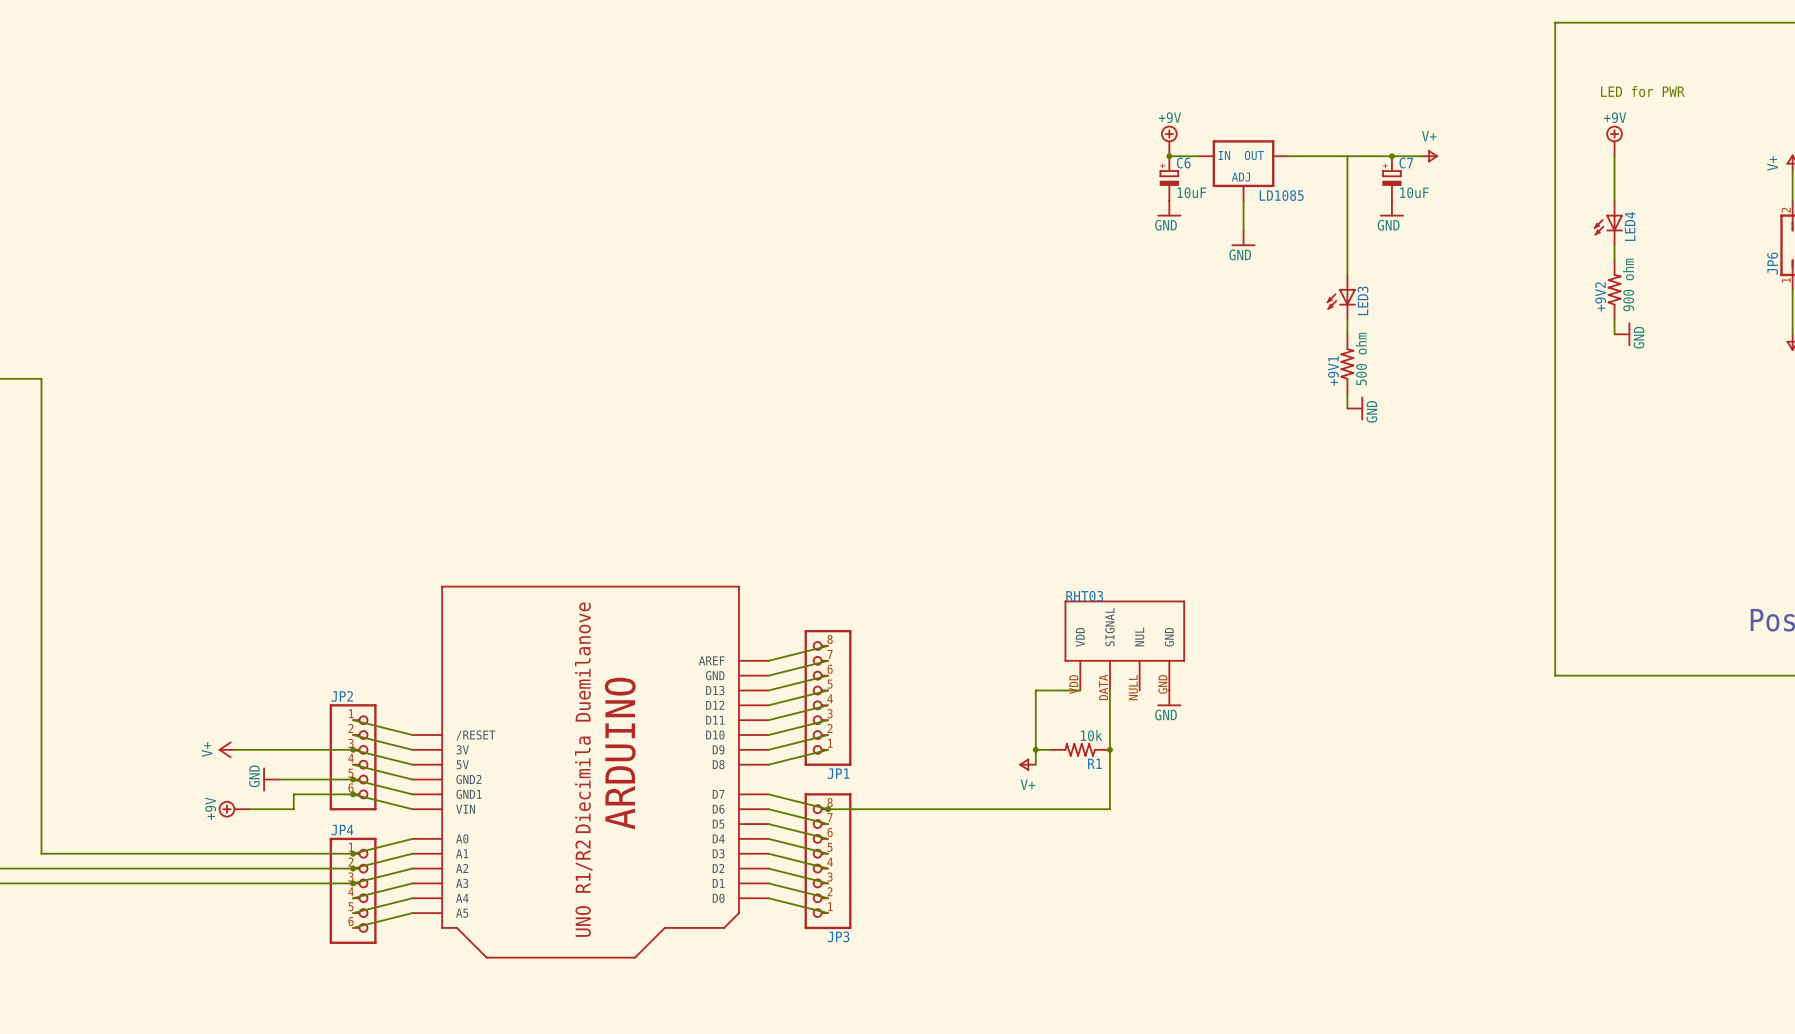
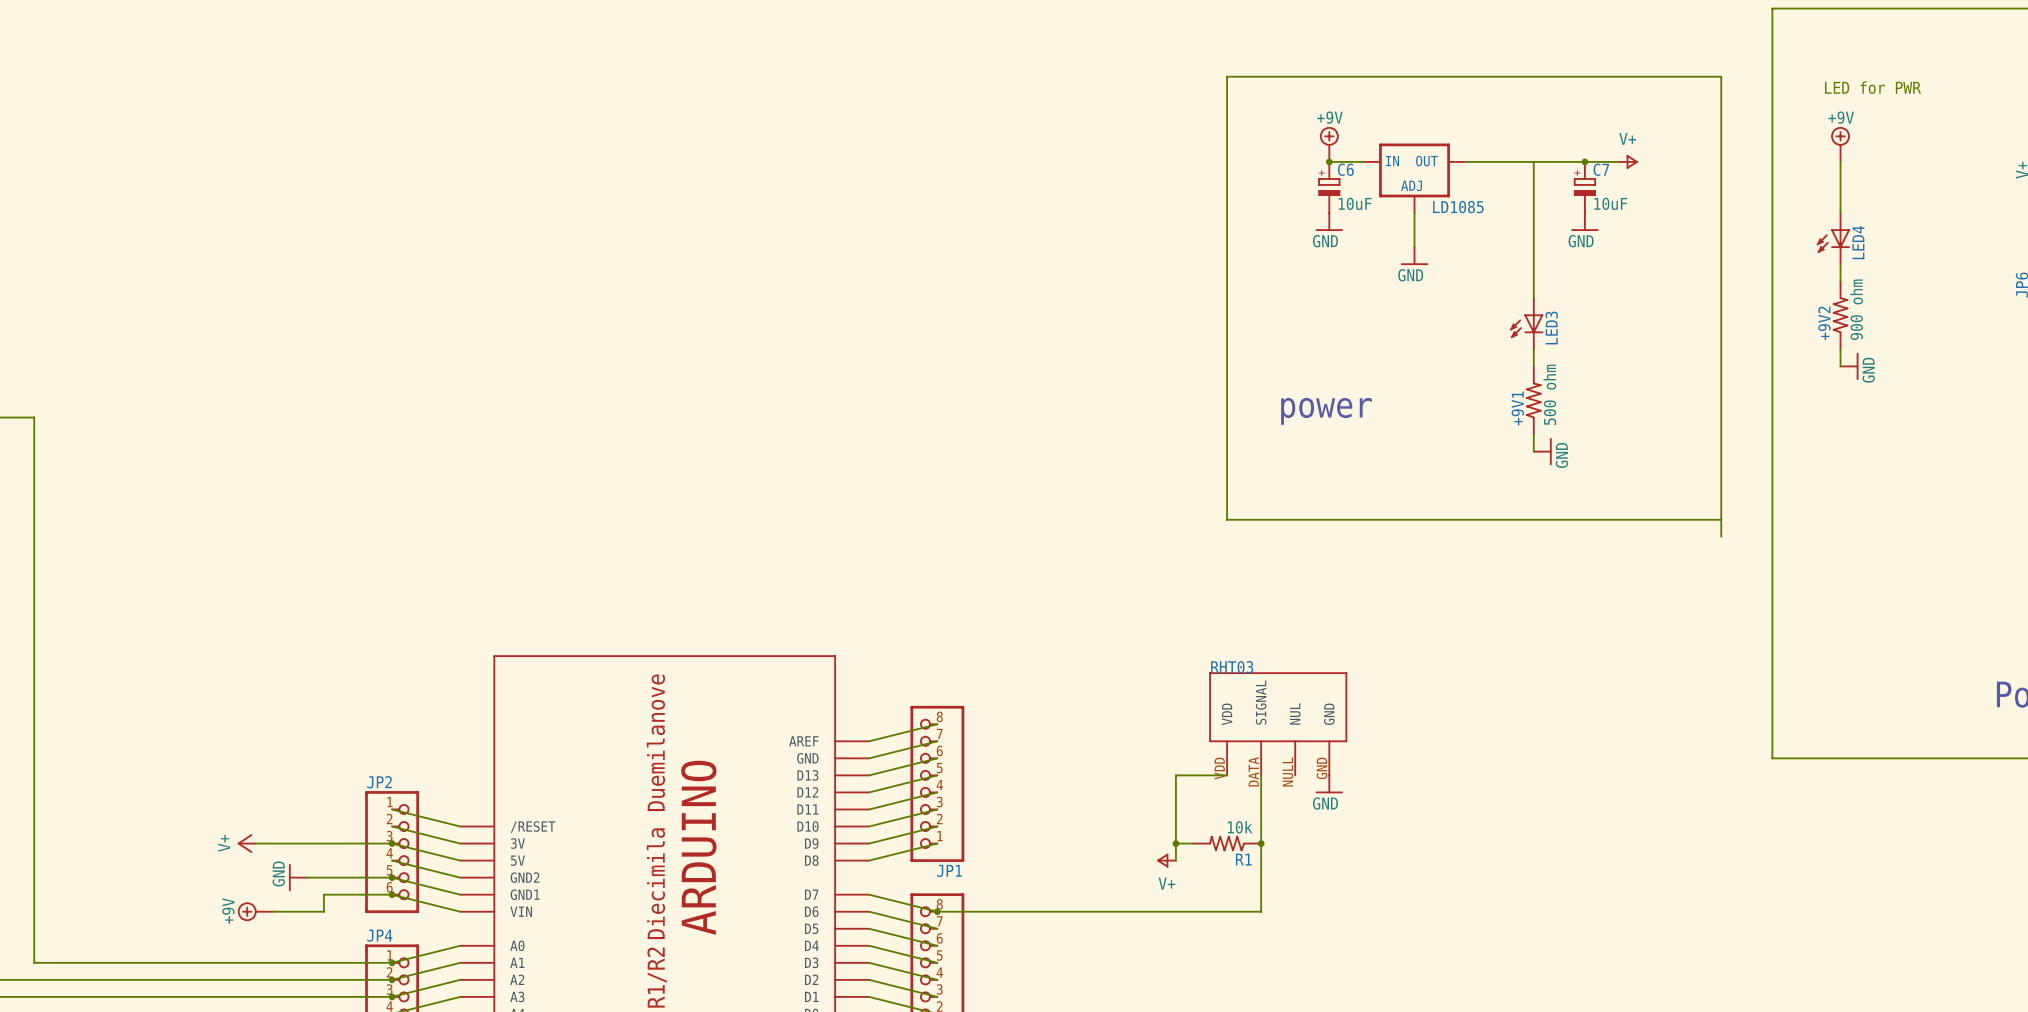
text: none -> power (1326, 411)
wire: none -> (1721, 519) (1227, 519) (1227, 76) (1721, 76) (1721, 536)

